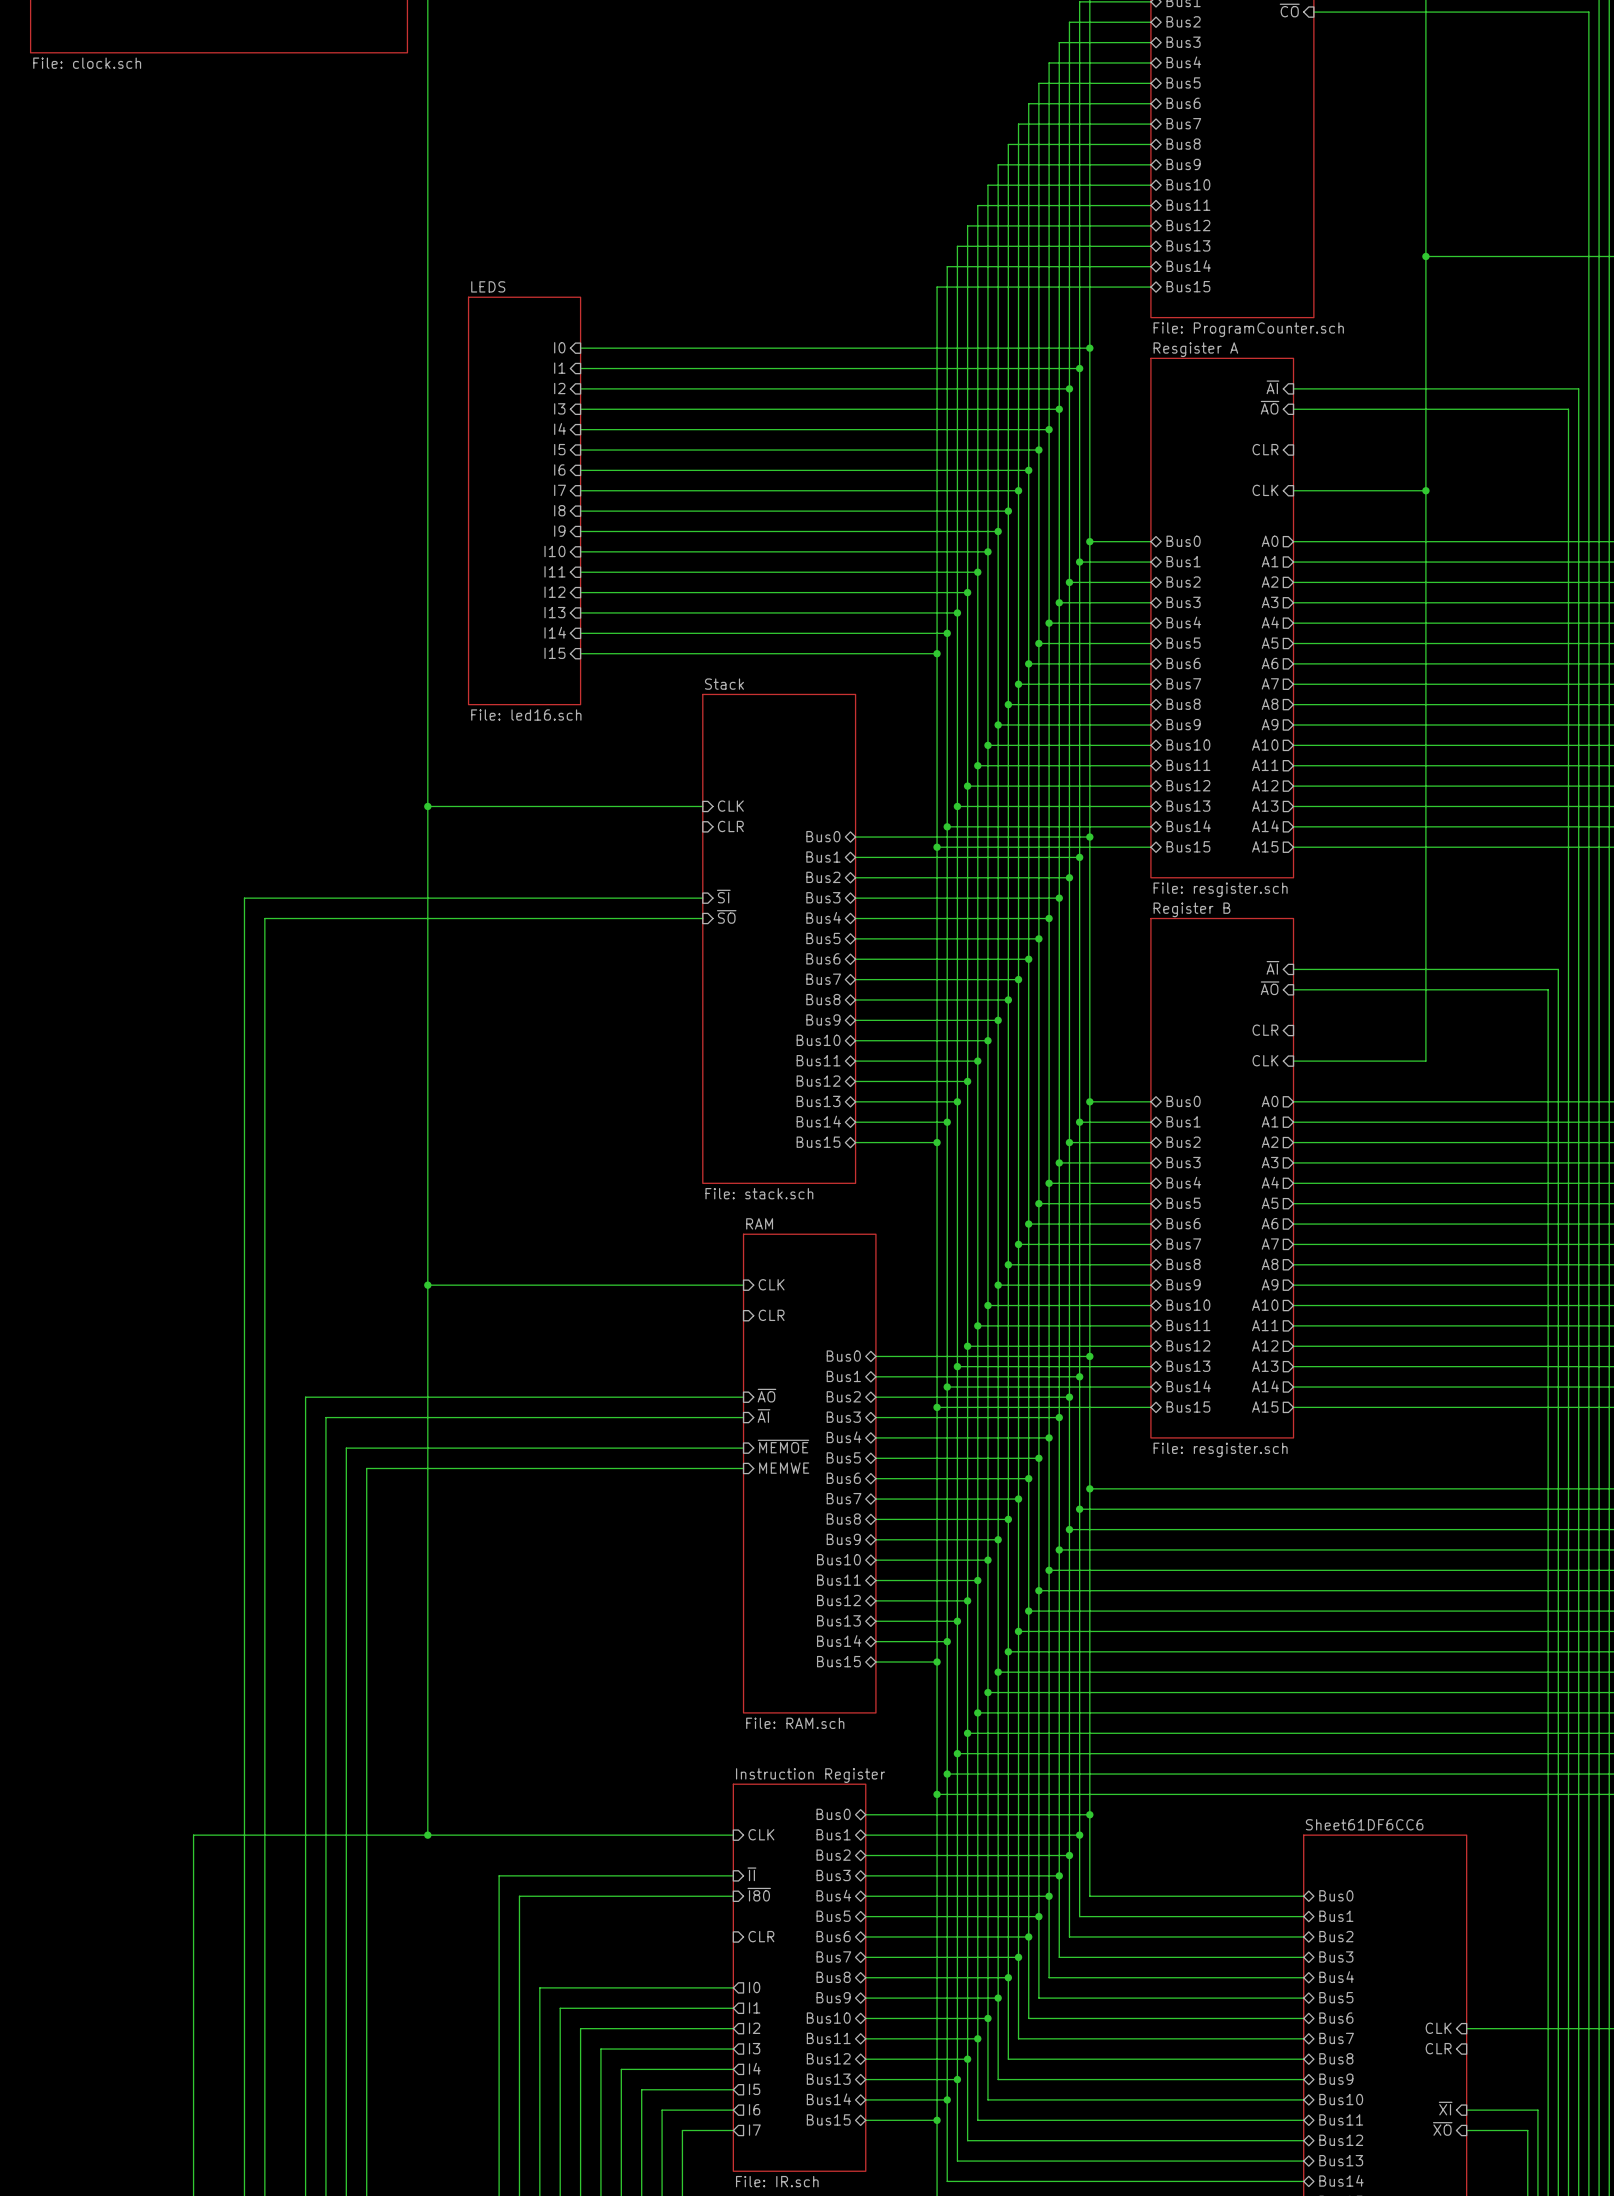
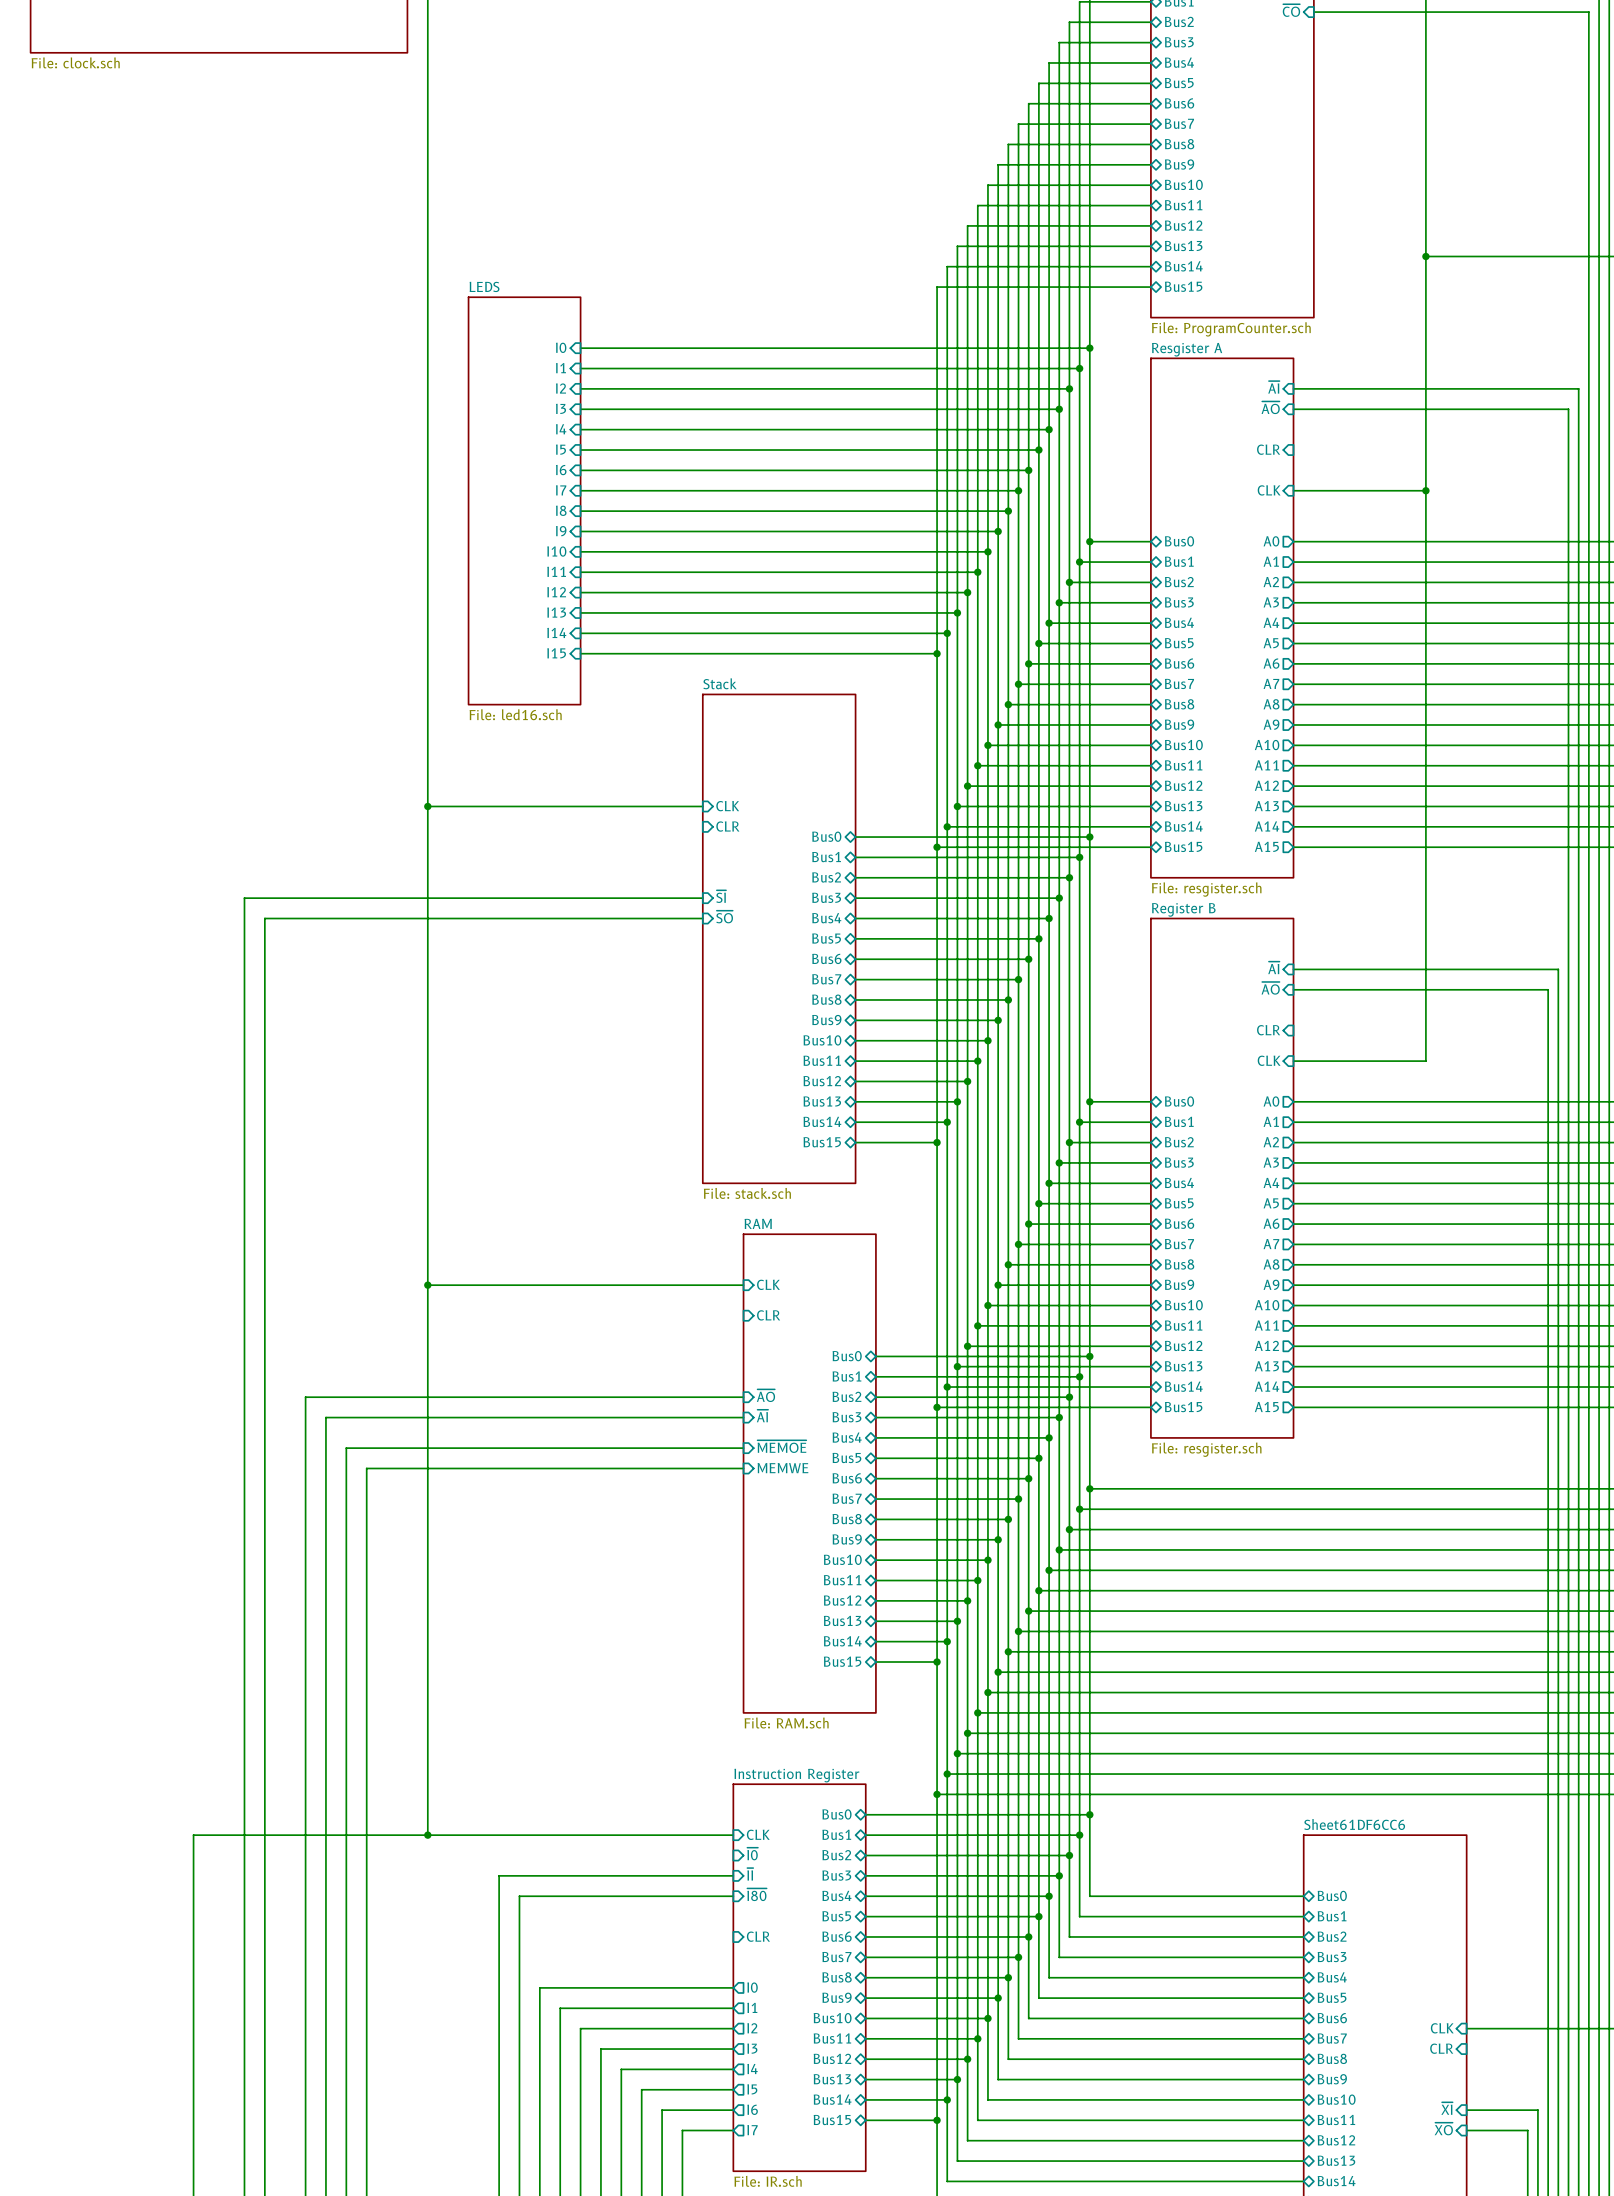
sheet pin: none -> ~{I0} (752, 1854)

